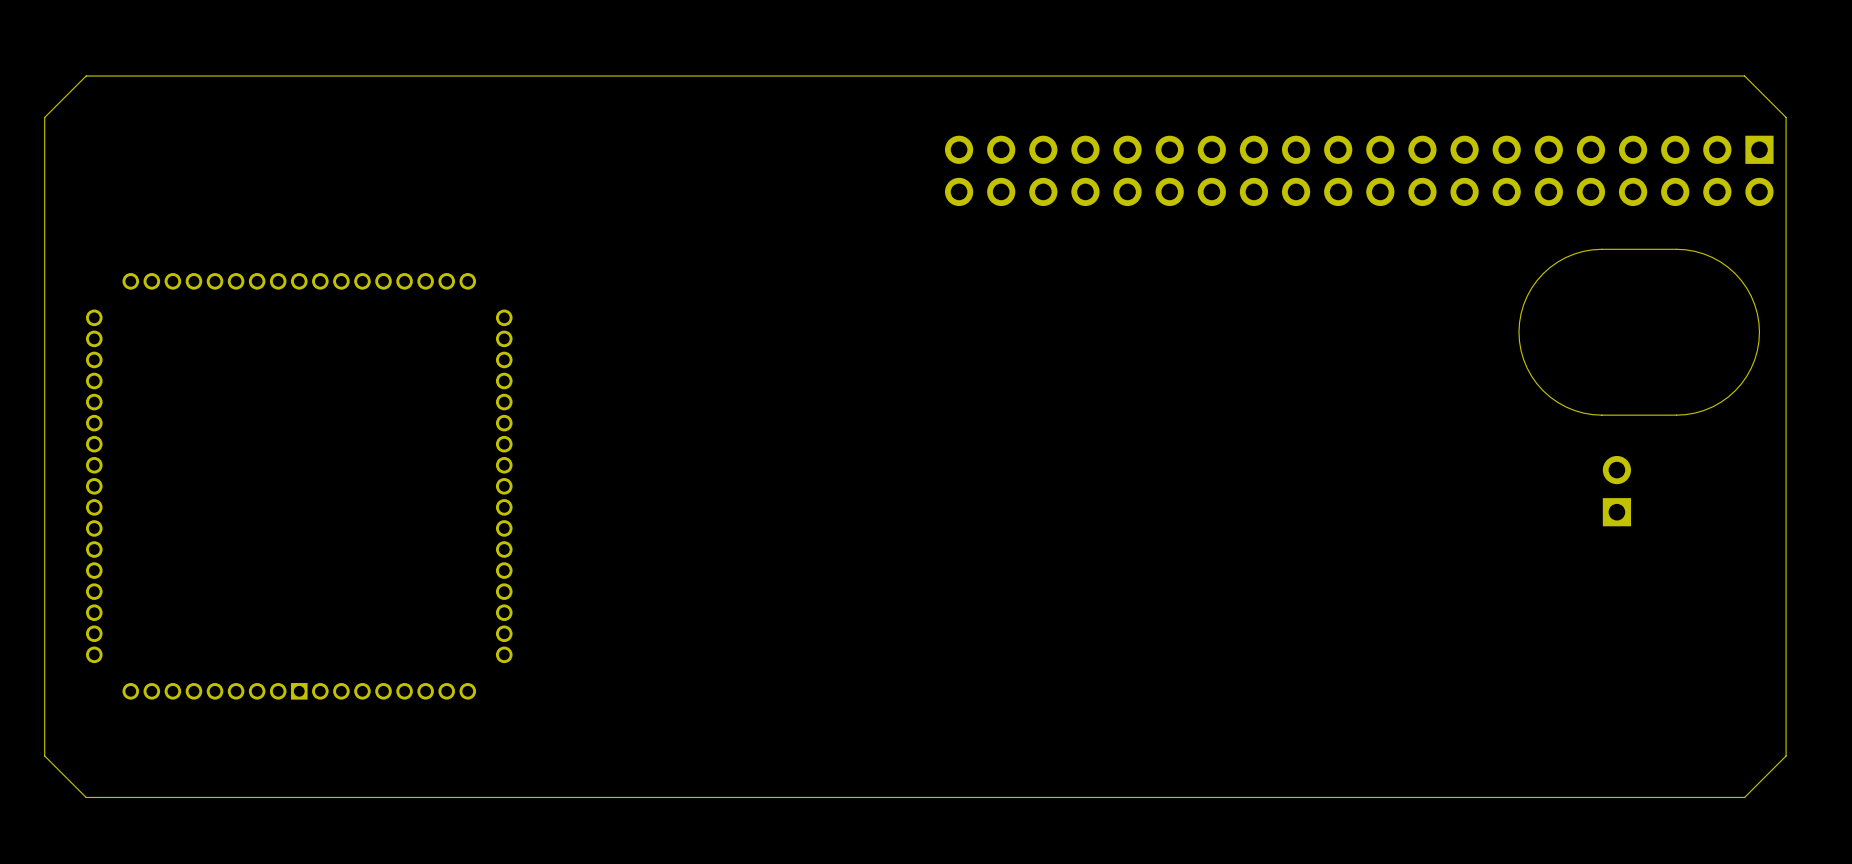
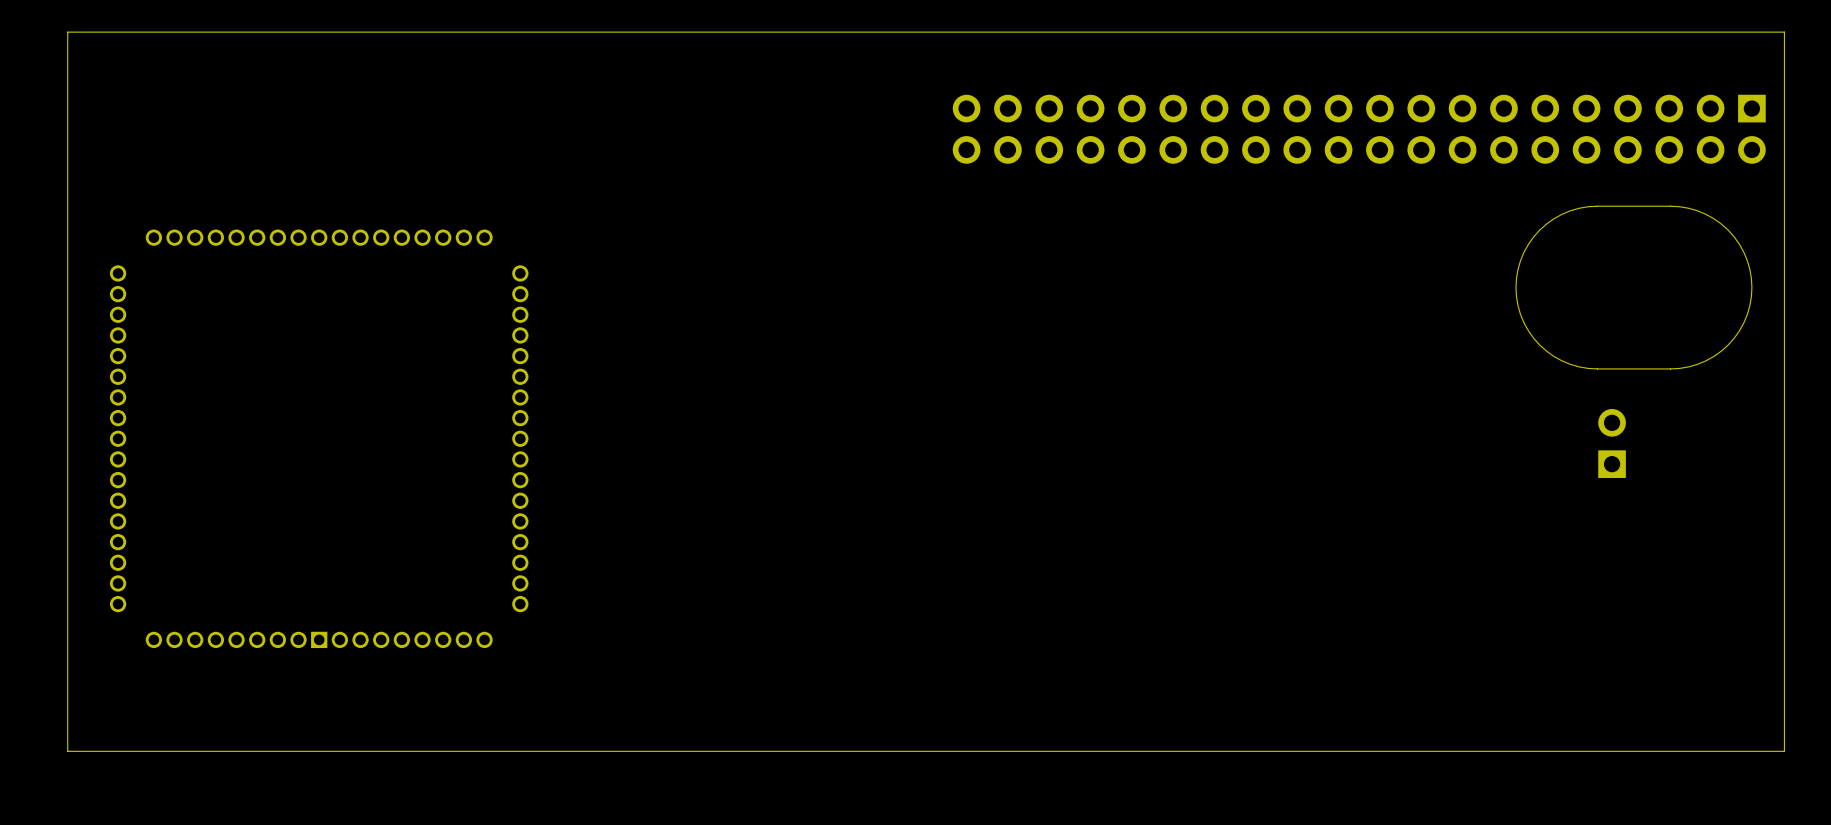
board edge: (1744, 76) (86, 76) (44, 117) (44, 755) (86, 797) (1744, 797) (1786, 755) (1786, 117) (1744, 76) -> (1784, 32) (1784, 751) (67, 751) (67, 32) (1784, 32)

